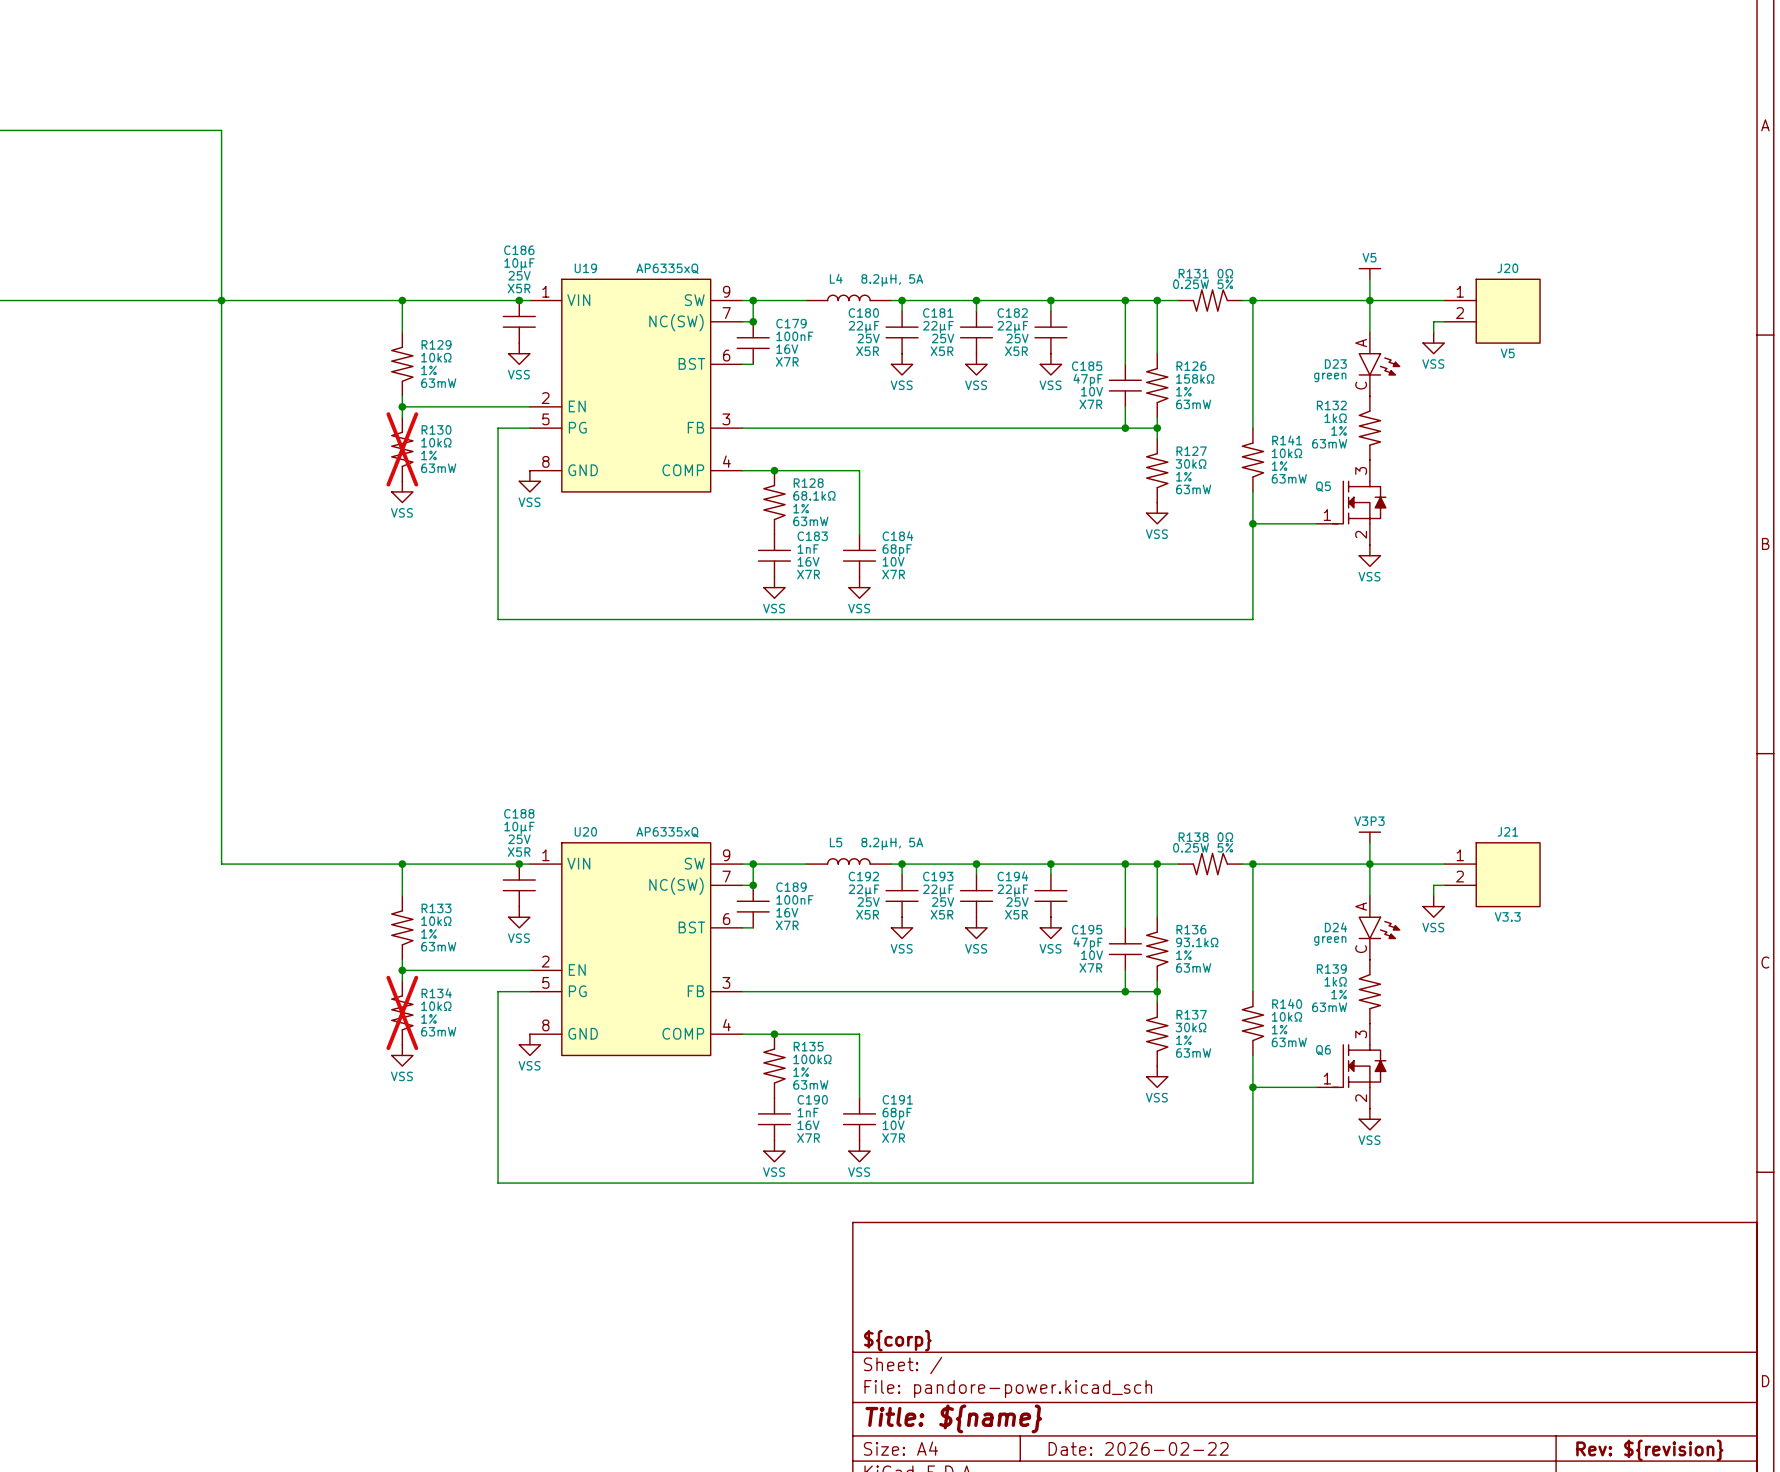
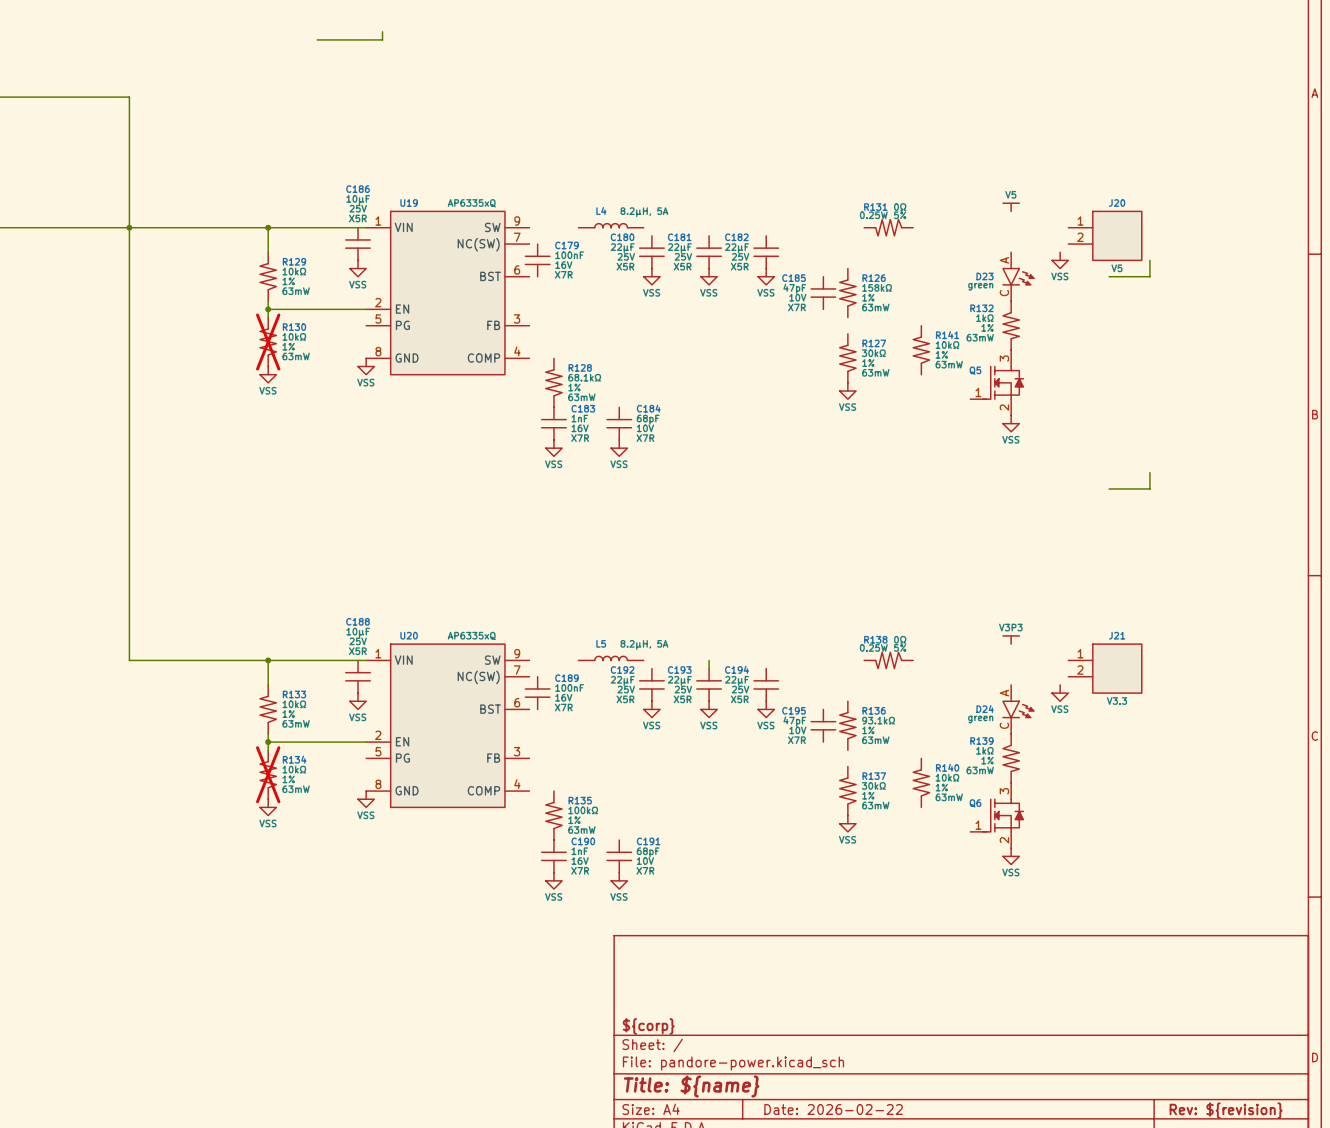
wire: none -> (382, 31) (382, 39) (317, 39)
wire: (1369, 279) (1369, 332) -> none
junction: (519, 300) -> none
wire: (742, 300) (806, 300) -> none
wire: (753, 300) (753, 321) (742, 321) -> none
junction: (753, 300) -> none
wire: (891, 300) (1178, 300) -> none
wire: (902, 300) (902, 311) -> none
junction: (902, 300) -> none
wire: (976, 300) (976, 311) -> none
junction: (976, 300) -> none
wire: (1050, 300) (1050, 311) -> none
junction: (1050, 300) -> none
wire: (1125, 300) (1125, 364) -> none
junction: (1125, 300) -> none
wire: (1157, 300) (1157, 353) -> none
junction: (1157, 300) -> none
wire: (1242, 300) (1444, 300) -> none
wire: (1252, 300) (1252, 428) -> none
junction: (1252, 300) -> none
junction: (1369, 300) -> none
junction: (753, 321) -> none
wire: (1444, 321) (1433, 321) (1433, 332) -> none
wire: none -> (1149, 260) (1149, 276) (1109, 276)
wire: (742, 364) (753, 364) -> none
wire: (1125, 406) (1125, 428) -> none
wire: (1157, 417) (1157, 438) -> none
wire: (529, 428) (498, 428) (498, 619) (1252, 619) (1252, 491) -> none
wire: (742, 428) (1157, 428) -> none
junction: (1125, 428) -> none
junction: (1157, 428) -> none
wire: (742, 470) (859, 470) (859, 534) -> none
junction: (774, 470) -> none
wire: (1252, 523) (1316, 523) -> none
junction: (1252, 523) -> none
wire: none -> (1149, 472) (1149, 488) (1109, 488)
wire: (1369, 842) (1369, 895) -> none
junction: (519, 864) -> none
wire: (742, 864) (806, 864) -> none
wire: (753, 864) (753, 885) (742, 885) -> none
junction: (753, 864) -> none
wire: (891, 864) (1178, 864) -> none
wire: (902, 864) (902, 874) -> none
junction: (902, 864) -> none
junction: (976, 864) -> none
wire: (1050, 864) (1050, 874) -> none
junction: (1050, 864) -> none
wire: (1125, 864) (1125, 927) -> none
junction: (1125, 864) -> none
wire: (1157, 864) (1157, 917) -> none
junction: (1157, 864) -> none
wire: (1242, 864) (1444, 864) -> none
wire: (1252, 864) (1252, 991) -> none
junction: (1252, 864) -> none
junction: (1369, 864) -> none
junction: (753, 885) -> none
wire: (1444, 885) (1433, 885) (1433, 895) -> none
wire: (742, 927) (753, 927) -> none
wire: (1125, 970) (1125, 991) -> none
wire: (1157, 981) (1157, 1002) -> none
wire: (529, 991) (498, 991) (498, 1183) (1252, 1183) (1252, 1055) -> none
wire: (742, 991) (1157, 991) -> none
junction: (1125, 991) -> none
junction: (1157, 991) -> none
wire: (742, 1034) (859, 1034) (859, 1097) -> none
junction: (774, 1034) -> none
wire: (1252, 1087) (1316, 1087) -> none
junction: (1252, 1087) -> none

